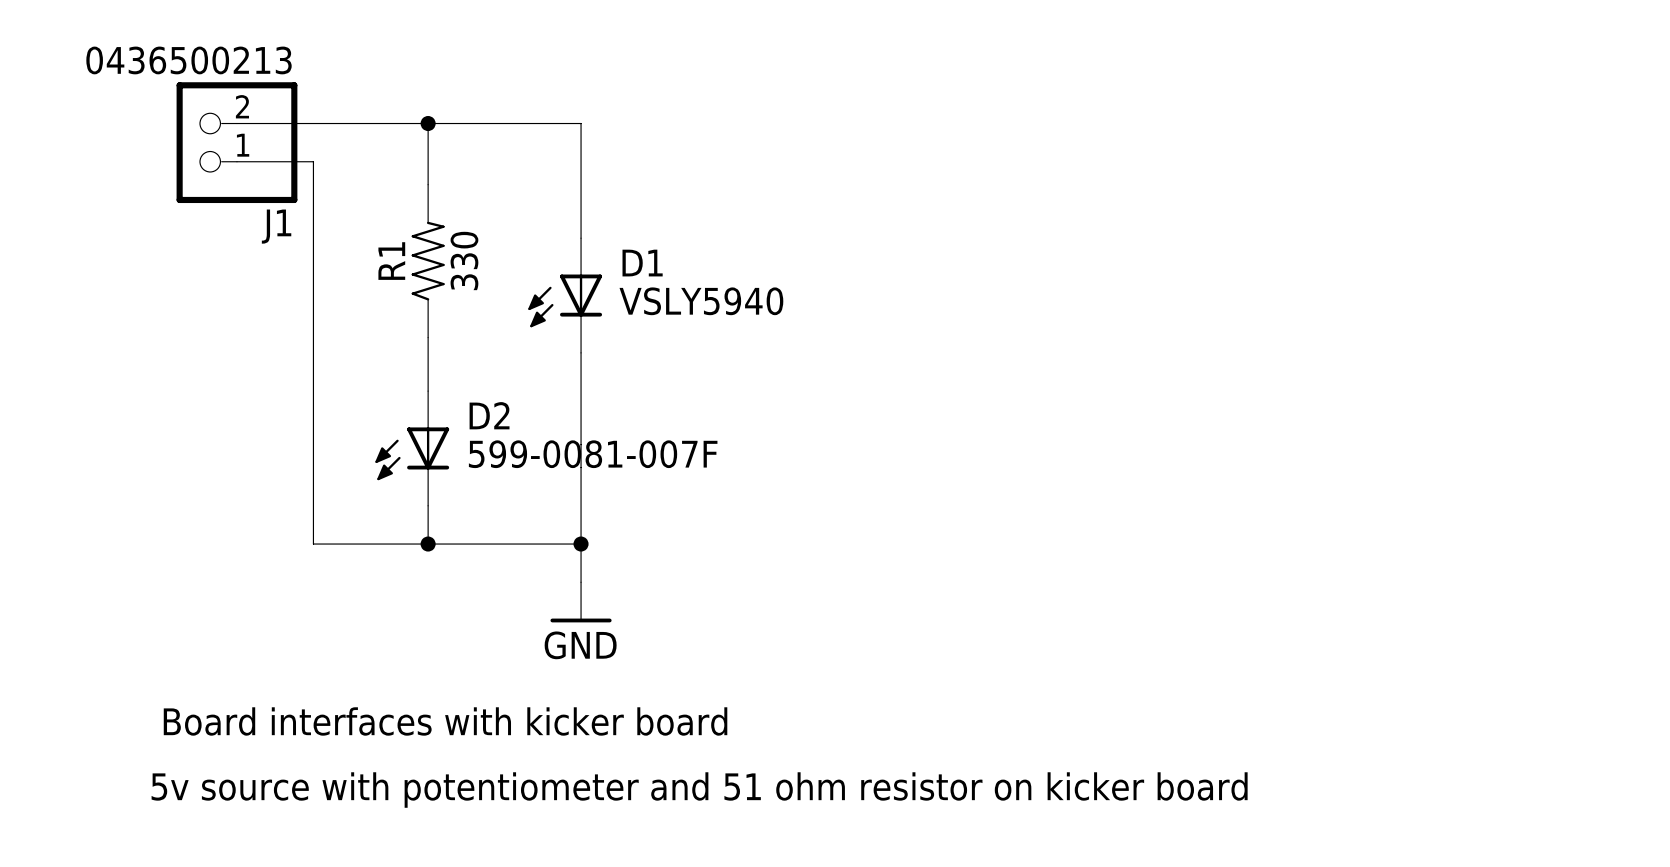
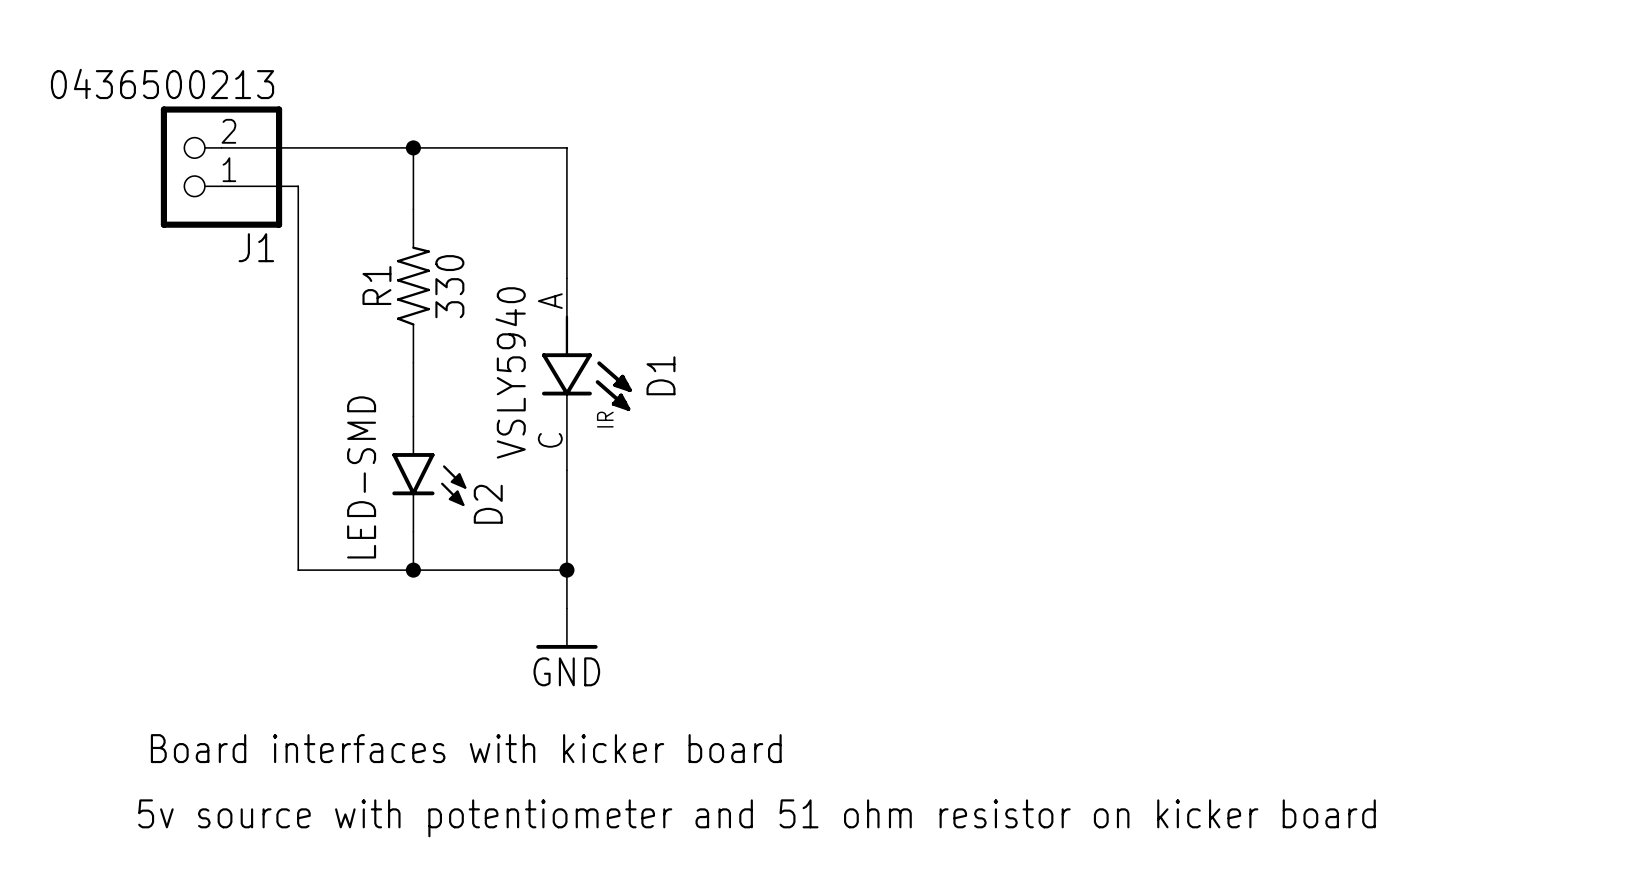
D1 symbol: [528, 238, 603, 353] -> [541, 278, 632, 471]
D1 name position: D1 (642, 263) -> D1 (660, 375)
D1 value position: VSLY5940 (701, 301) -> VSLY5940 (510, 372)
D2 symbol: [375, 391, 450, 506] -> [392, 416, 467, 532]
D2 name position: D2 (489, 415) -> D2 (488, 504)
D2 value: 599-0081-007F (593, 454) -> LED-SMD (361, 477)

